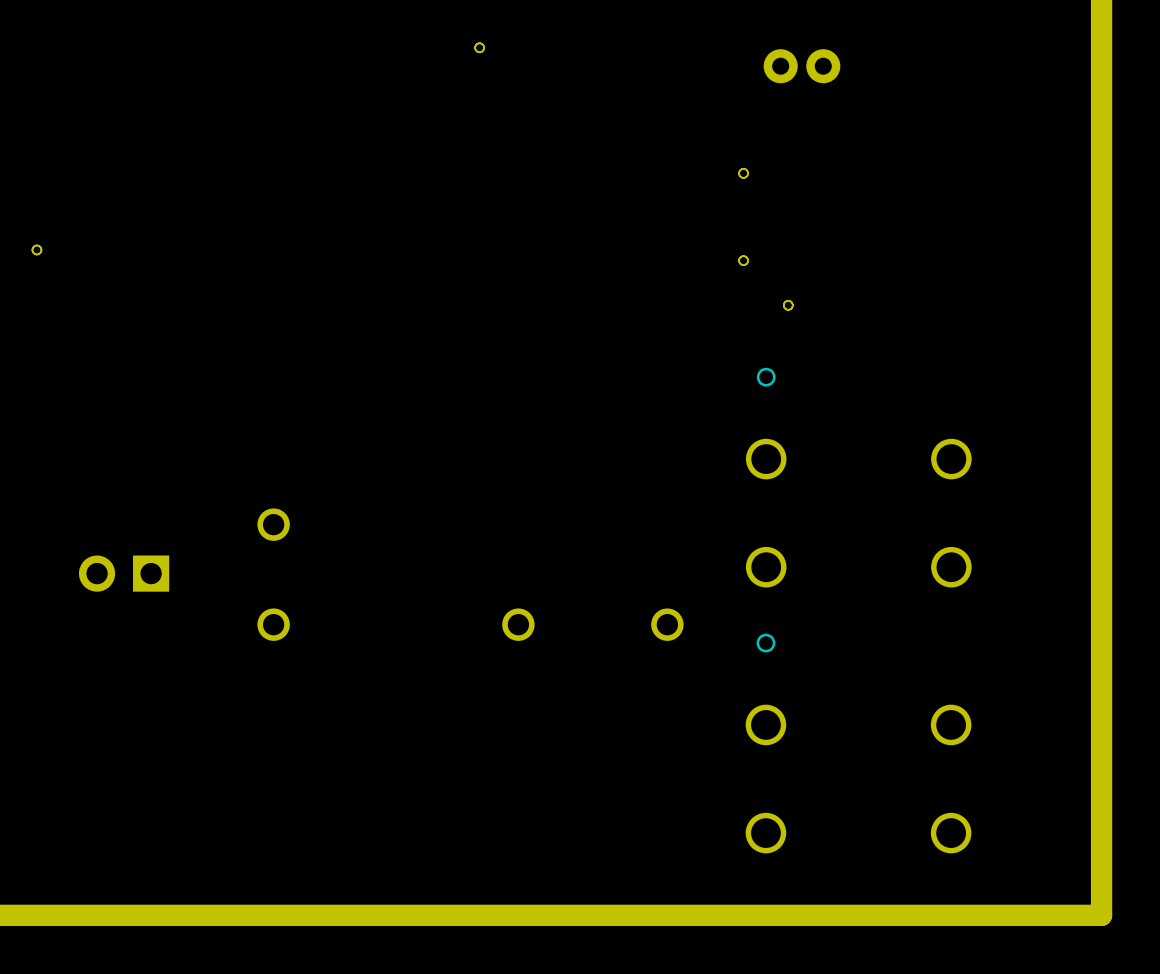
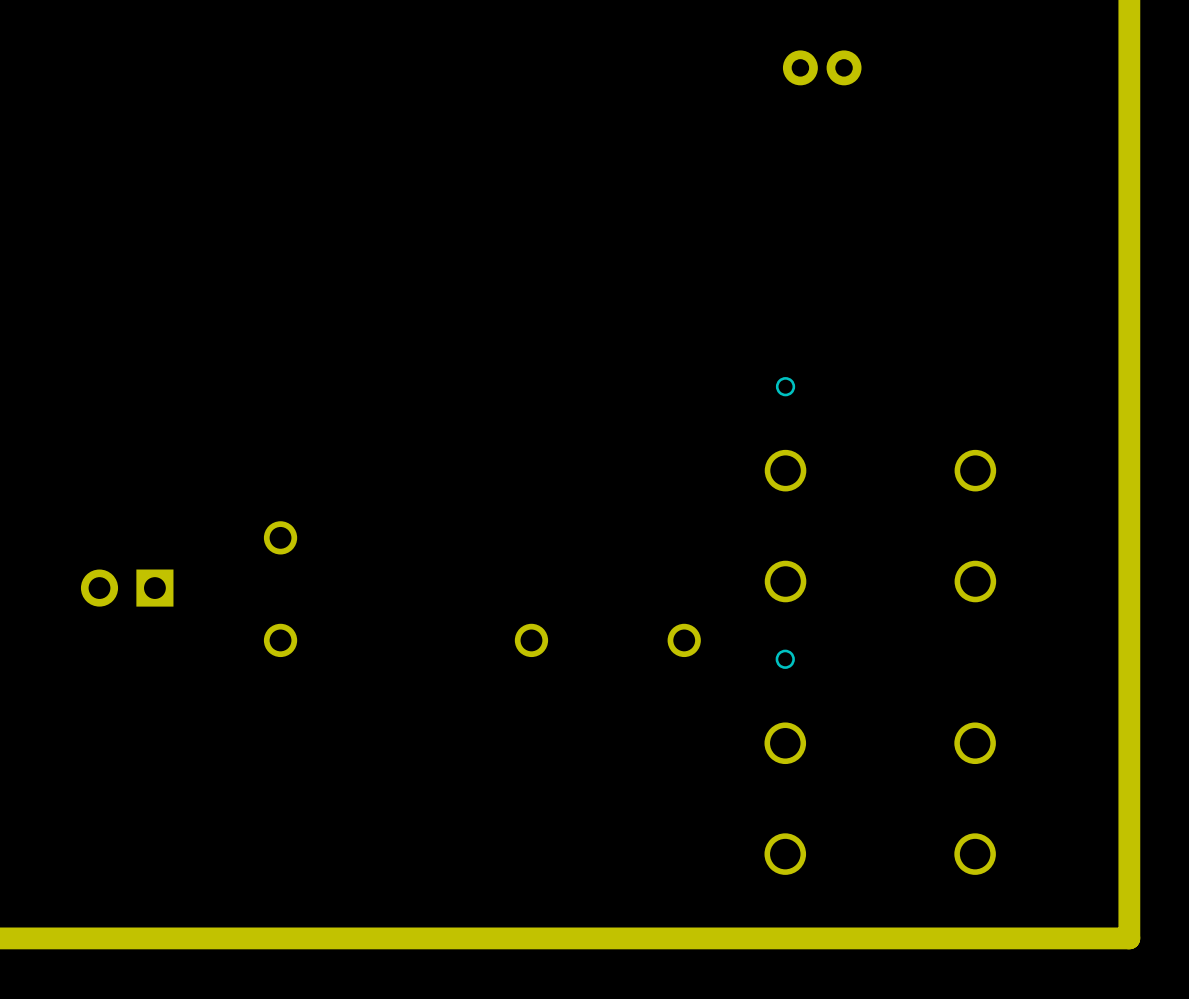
part: (479, 47) -> none
part: (743, 173) -> none
part: (36, 249) -> none
part: (743, 260) -> none
part: (788, 305) -> none

